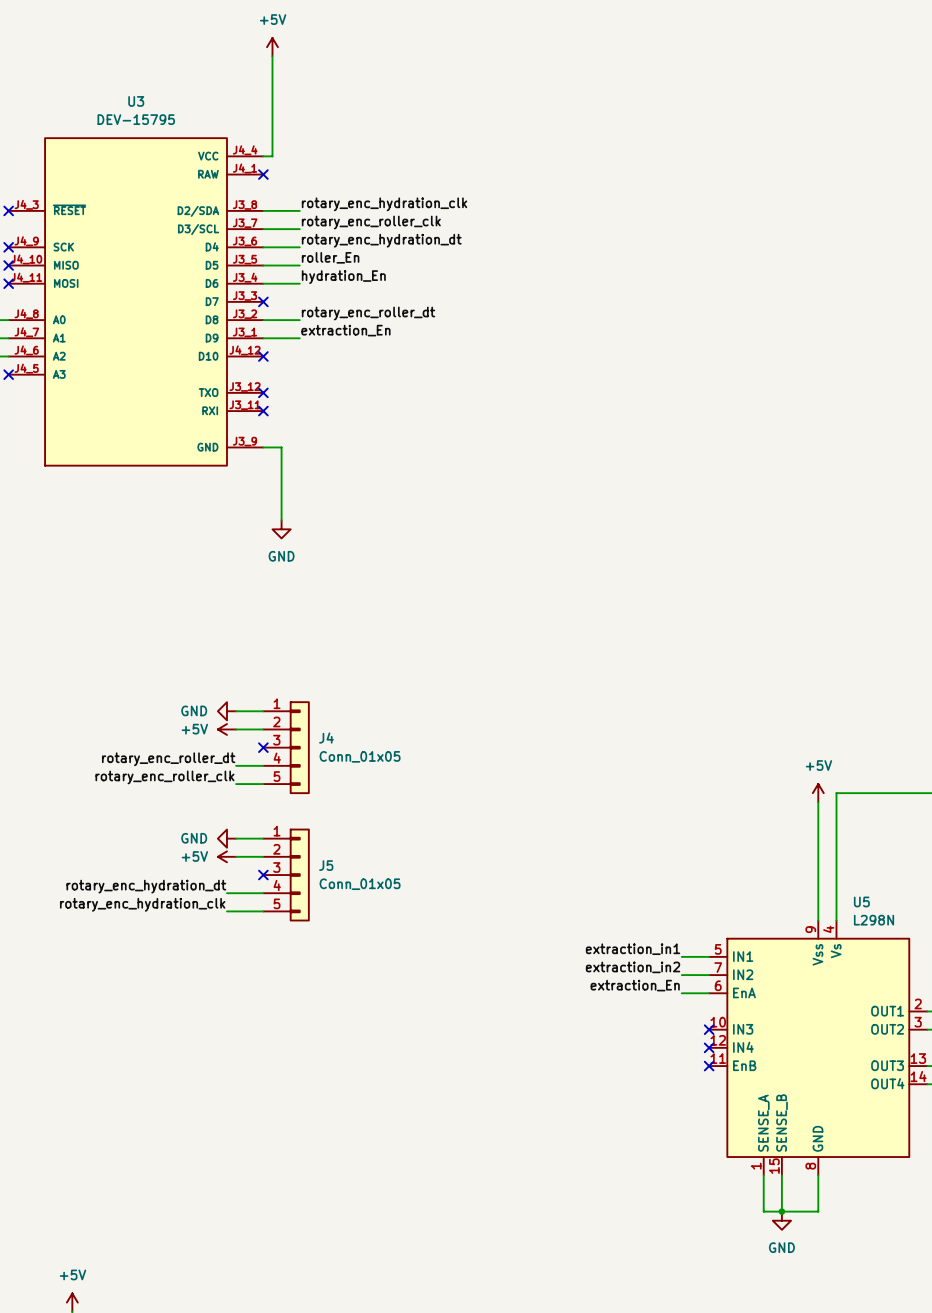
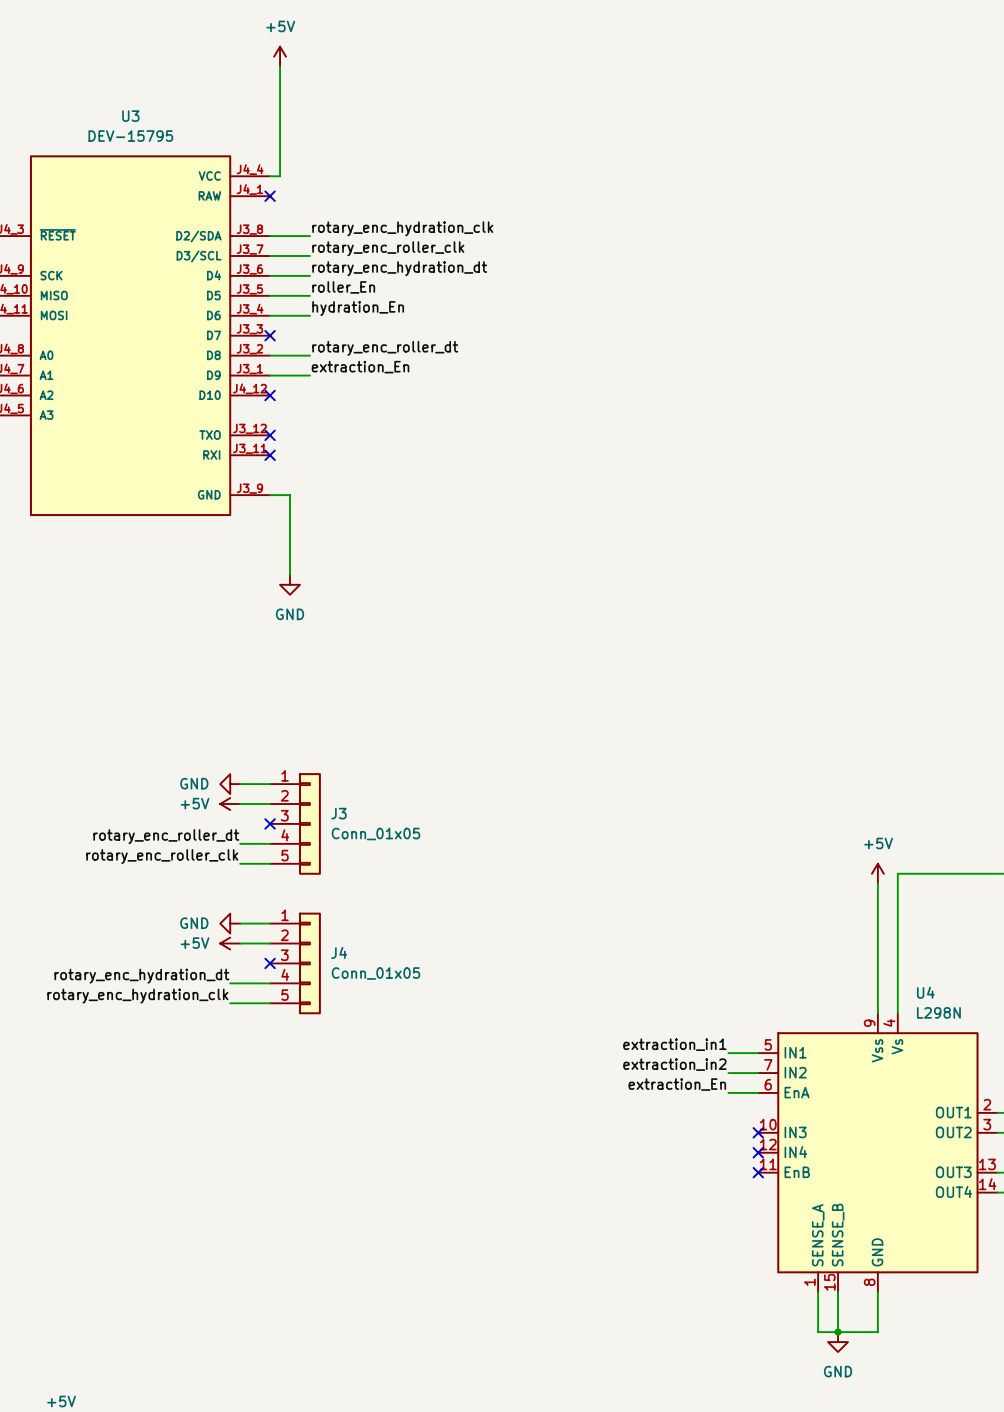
J4 name: J4 (326, 738) -> J3 (338, 813)
J5 name: J5 (326, 865) -> J4 (339, 952)
U5 name: U5 (861, 901) -> U4 (925, 992)

